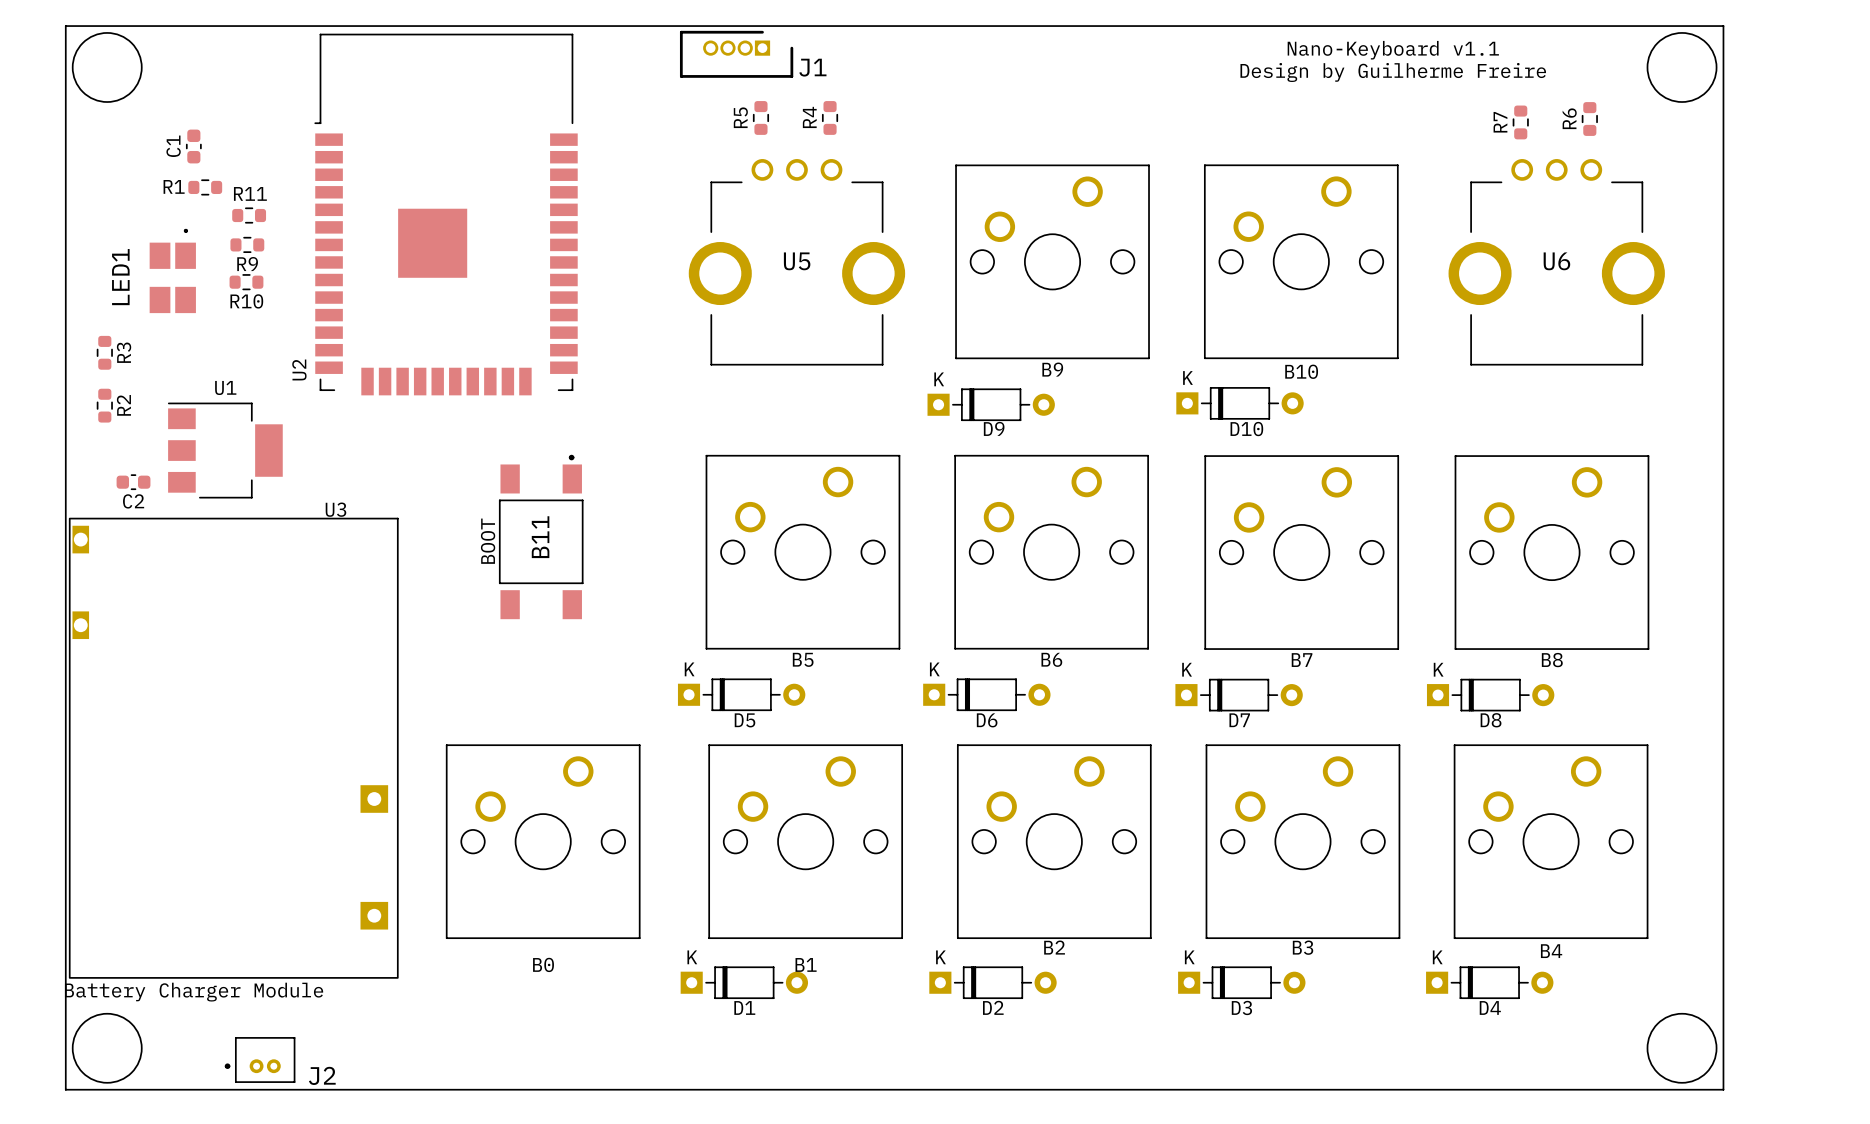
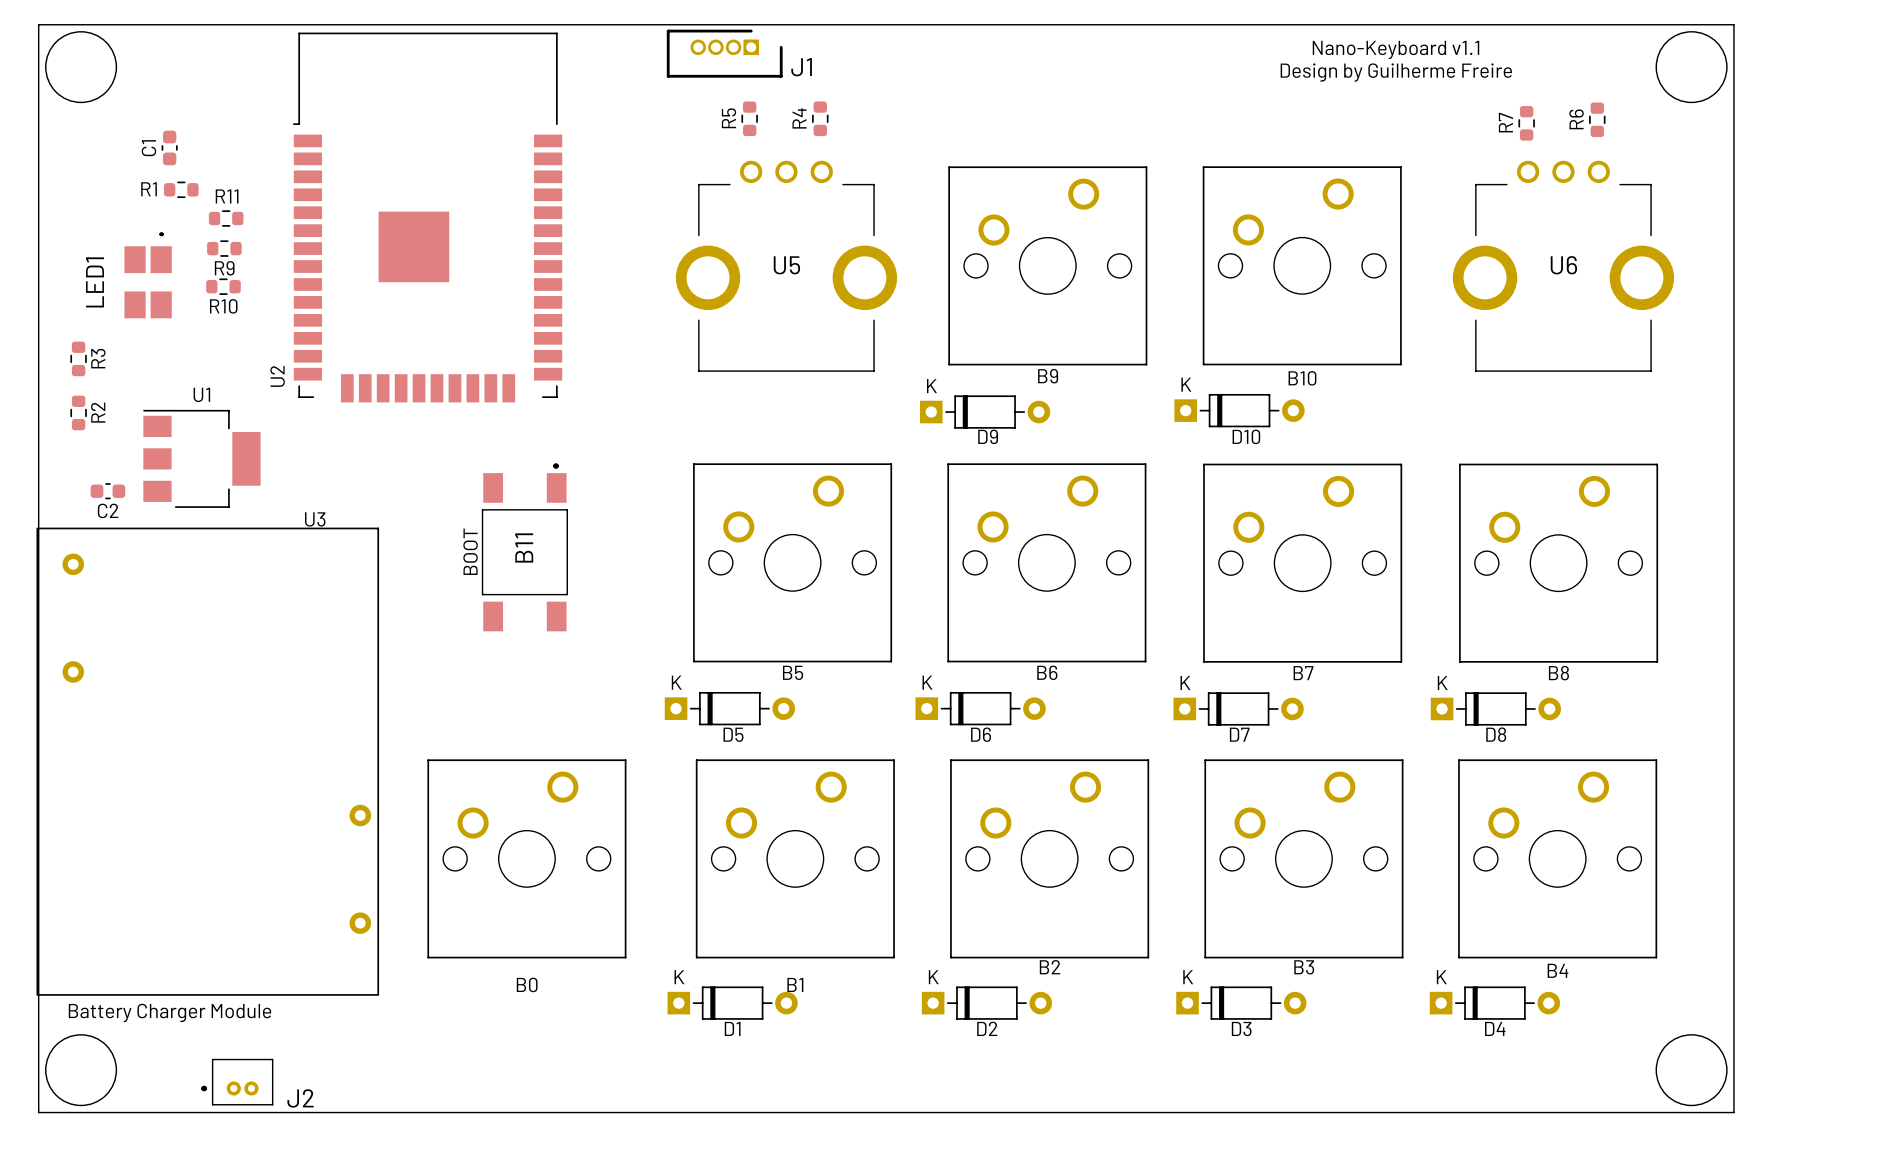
U3 footprint: [68, 517, 399, 979] -> [36, 527, 380, 996]

